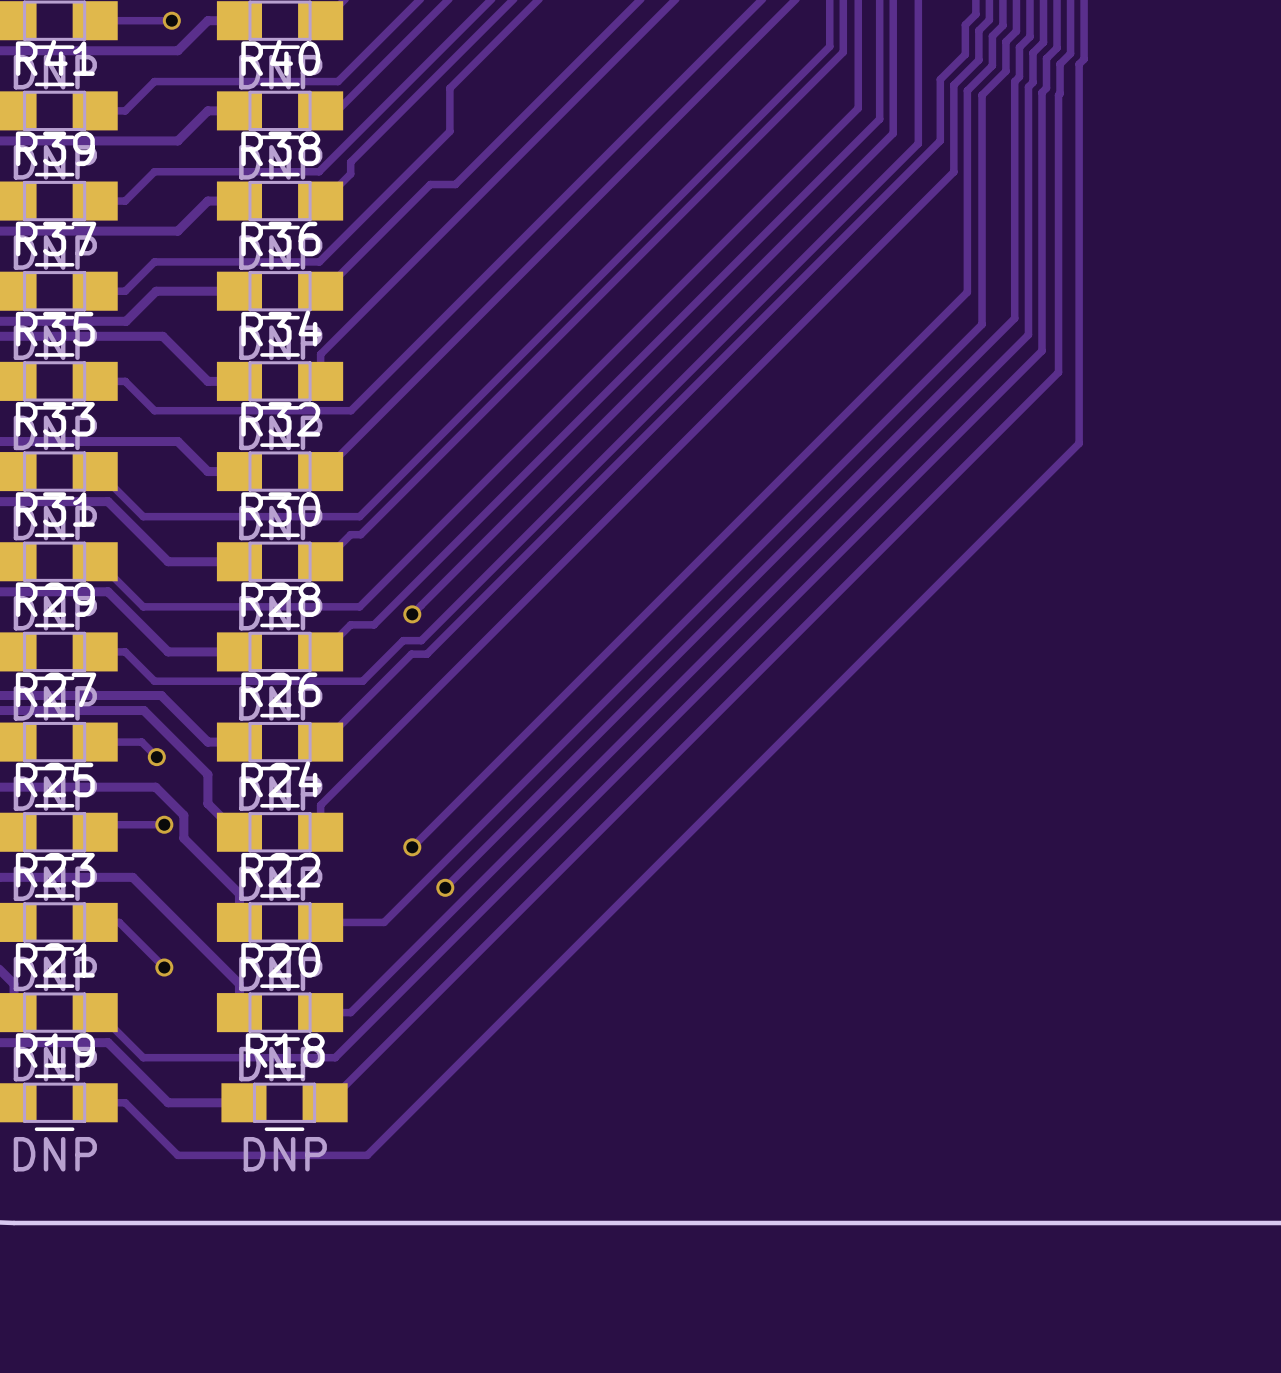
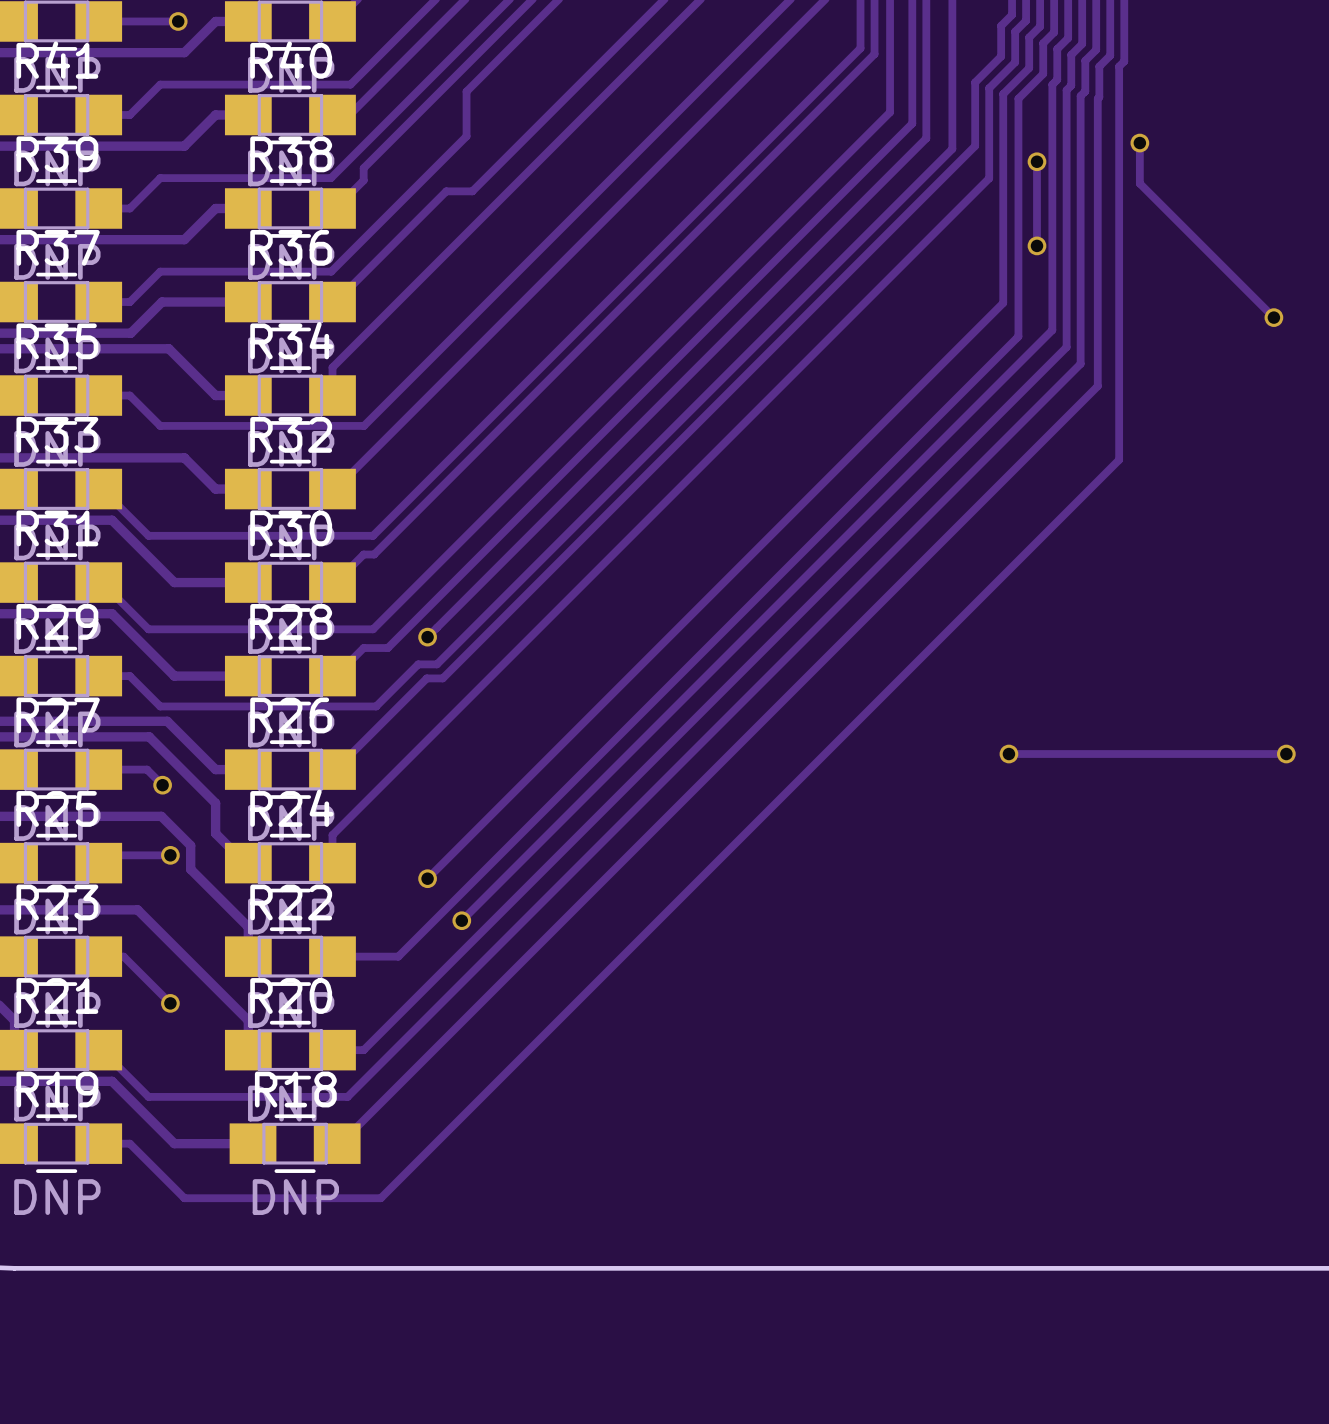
track: none -> (1139, 143) (1139, 183) (1273, 317)
via: none -> (1139, 143)
track: none -> (1036, 161) (1036, 245)
via: none -> (1036, 161)
via: none -> (1036, 245)
via: none -> (1273, 317)
via: none -> (1008, 754)
track: none -> (1286, 754) (1008, 754)
via: none -> (1286, 754)

